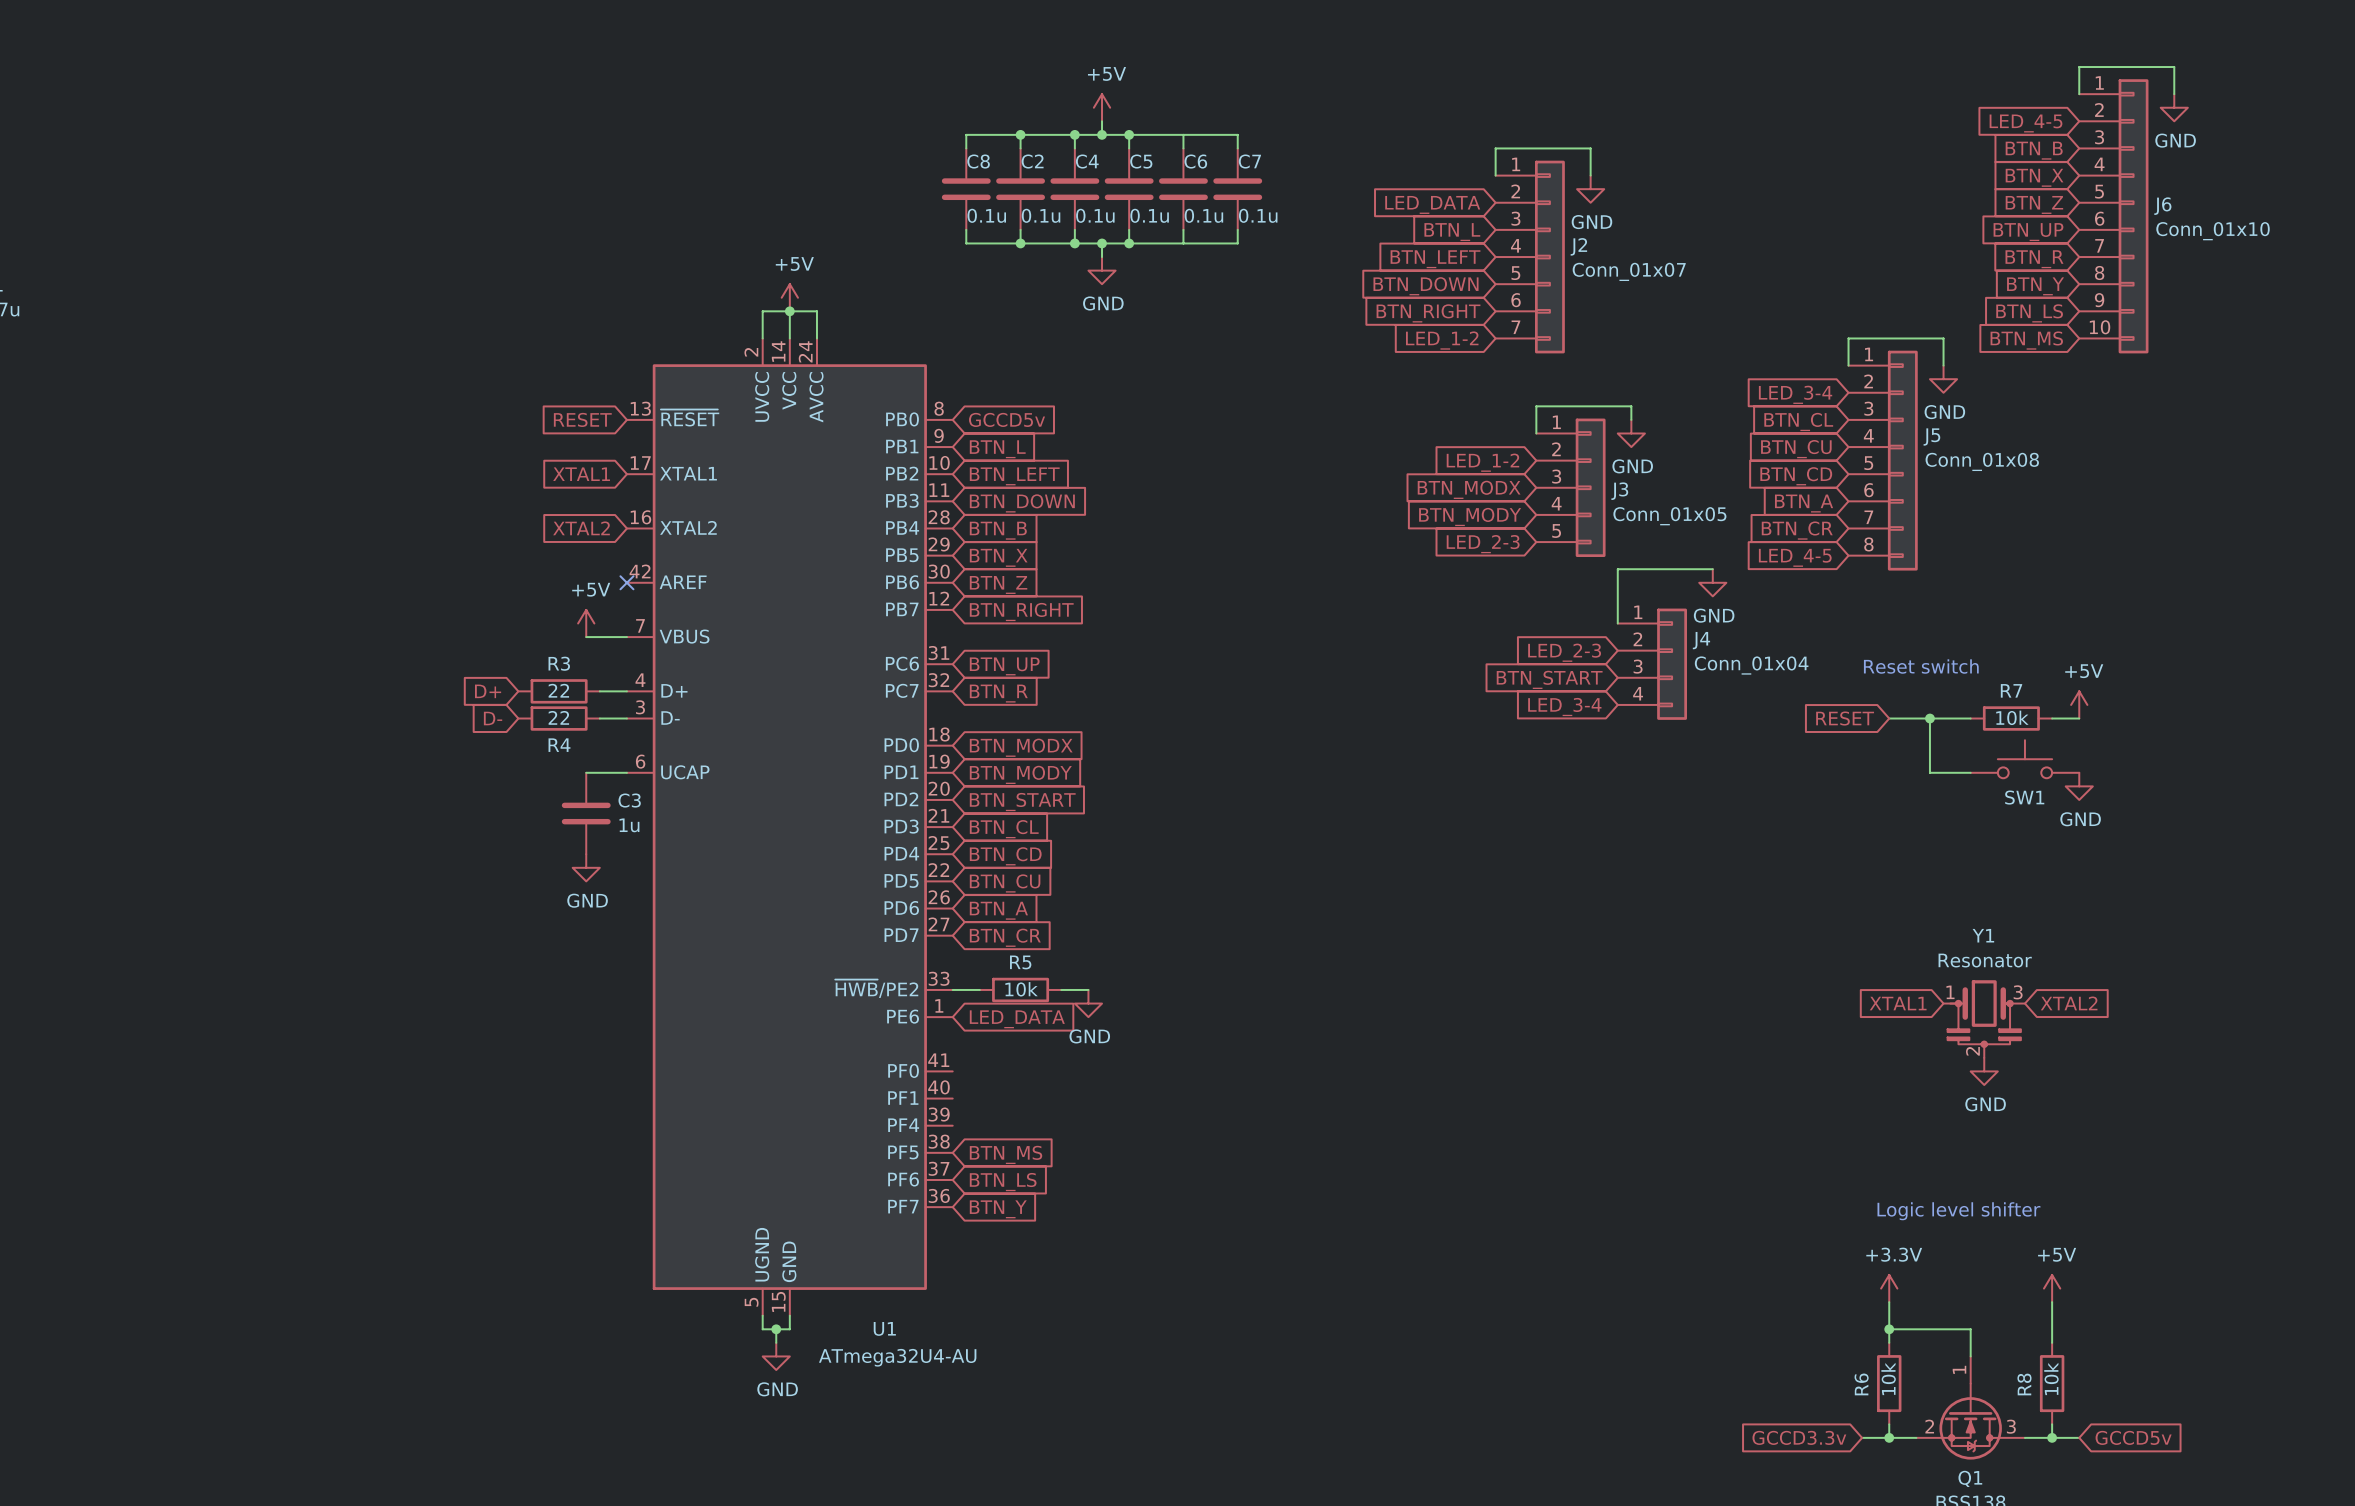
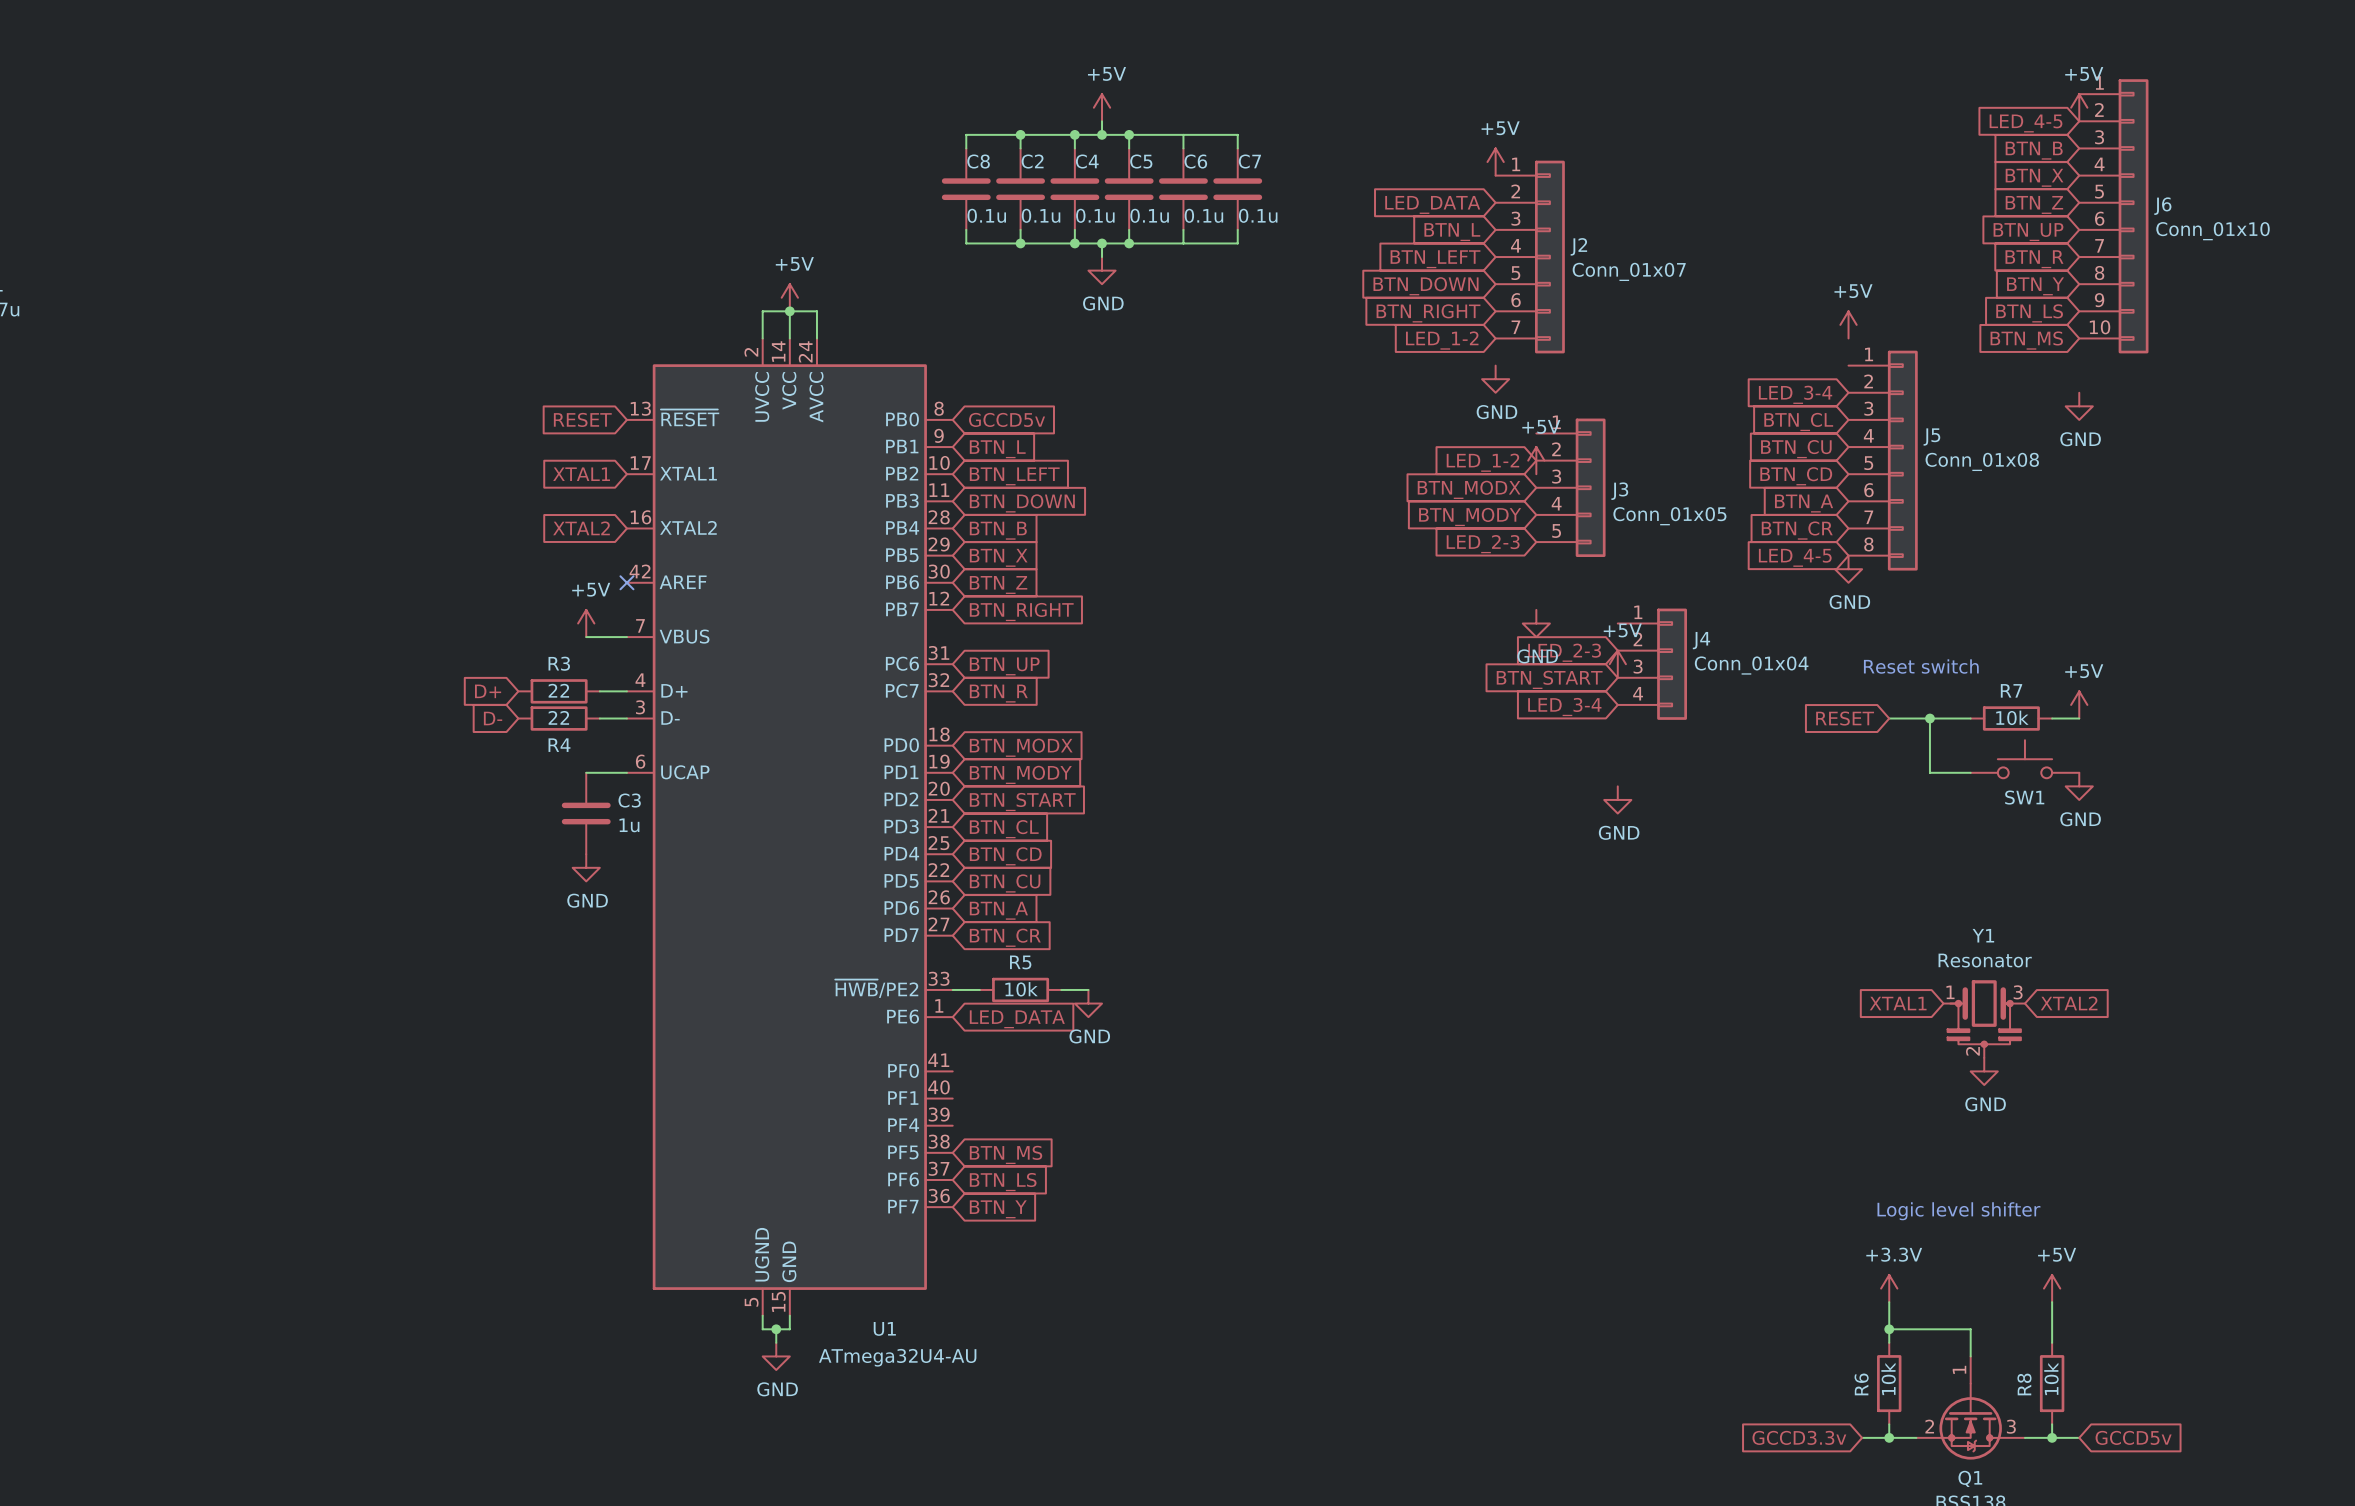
wire: (2079, 94) (2079, 67) (2174, 67) (2174, 94) -> none
power symbol: none -> +5V (2079, 107)
power symbol: GND (2174, 107) -> none
power symbol: none -> +5V (1495, 162)
wire: (1495, 175) (1495, 148) (1590, 148) (1590, 175) -> none
power symbol: GND (1590, 189) -> none
power symbol: none -> +5V (1848, 324)
wire: (1848, 365) (1848, 338) (1943, 338) (1943, 365) -> none
power symbol: none -> GND (1495, 379)
power symbol: GND (1943, 379) -> none
power symbol: none -> GND (2079, 406)
wire: (1631, 419) (1631, 406) (1536, 406) (1536, 433) -> none
power symbol: GND (1631, 433) -> none
power symbol: none -> +5V (1536, 460)
wire: (1712, 569) (1617, 569) (1617, 623) -> none
power symbol: none -> GND (1848, 569)
power symbol: GND (1712, 582) -> none
power symbol: none -> GND (1536, 623)
power symbol: none -> +5V (1617, 664)
power symbol: none -> GND (1617, 799)

